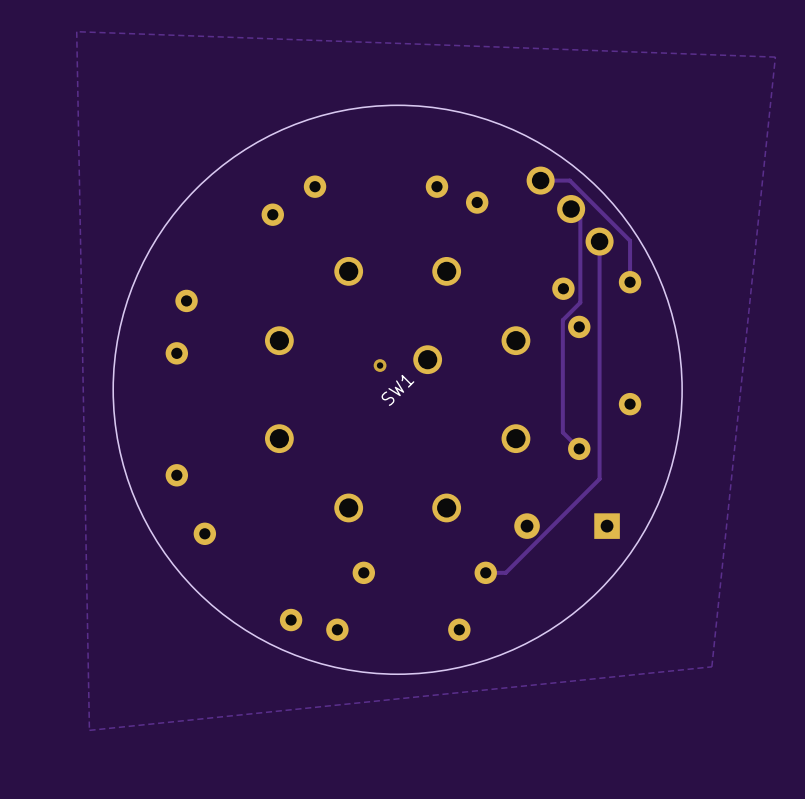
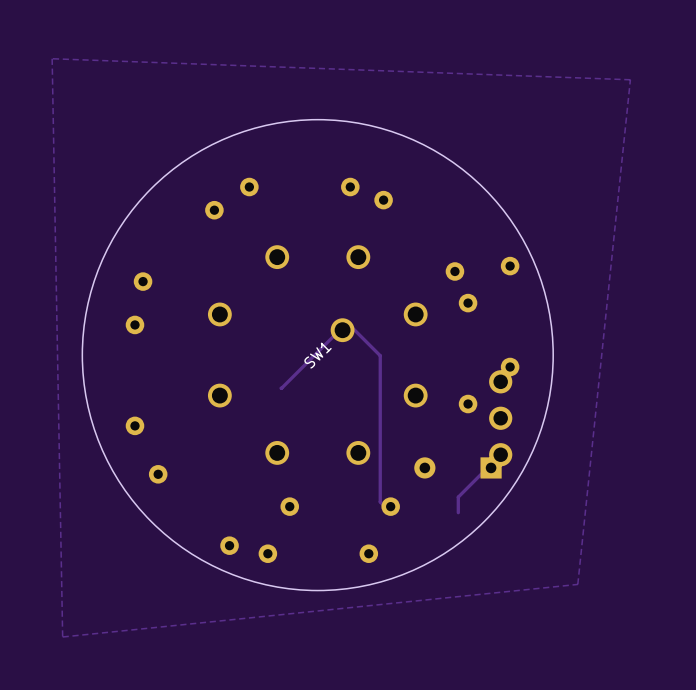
track: (540, 180) (569, 180) (630, 240) (630, 282) -> none
part: (540, 180) -> none
track: (571, 209) (580, 218) (580, 302) (562, 320) (562, 432) (579, 448) -> none
part: (571, 209) -> none
track: (599, 241) (599, 479) (505, 572) (485, 572) -> none
part: (599, 241) -> none
via: (380, 365) -> none
part: none -> (500, 381)
track: none -> (281, 388) (347, 322) (380, 355) (380, 501) (391, 512)
part: none -> (500, 418)
track: none -> (500, 454) (458, 497) (458, 512)
part: none -> (500, 454)

